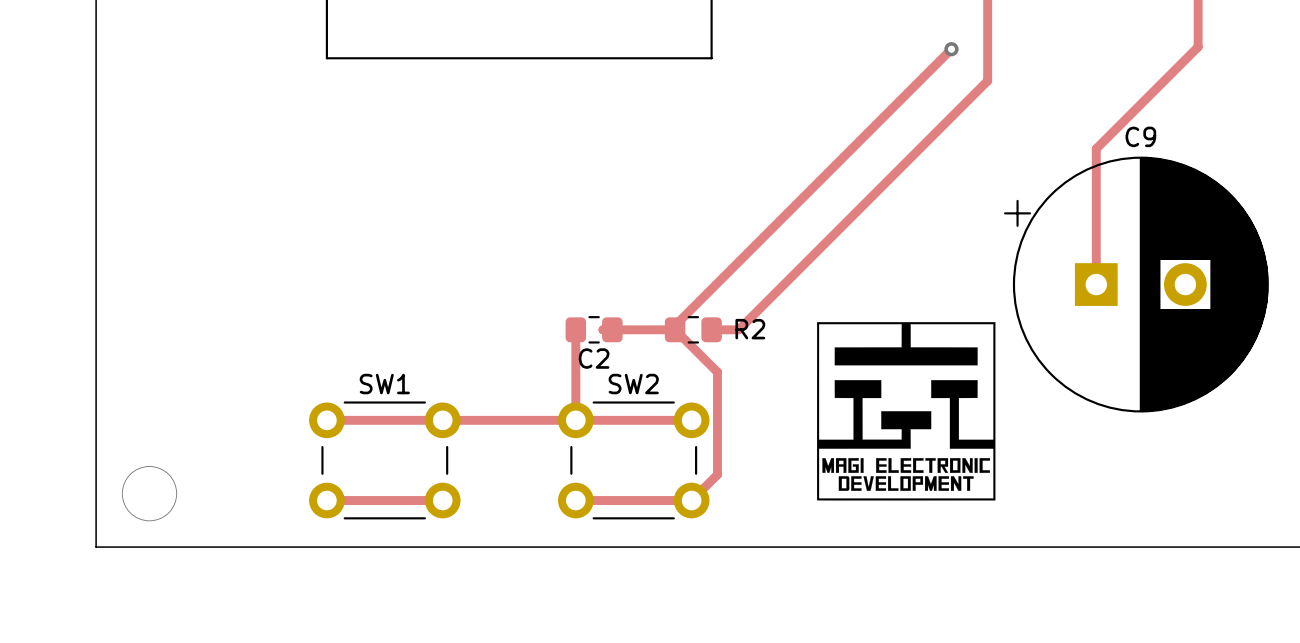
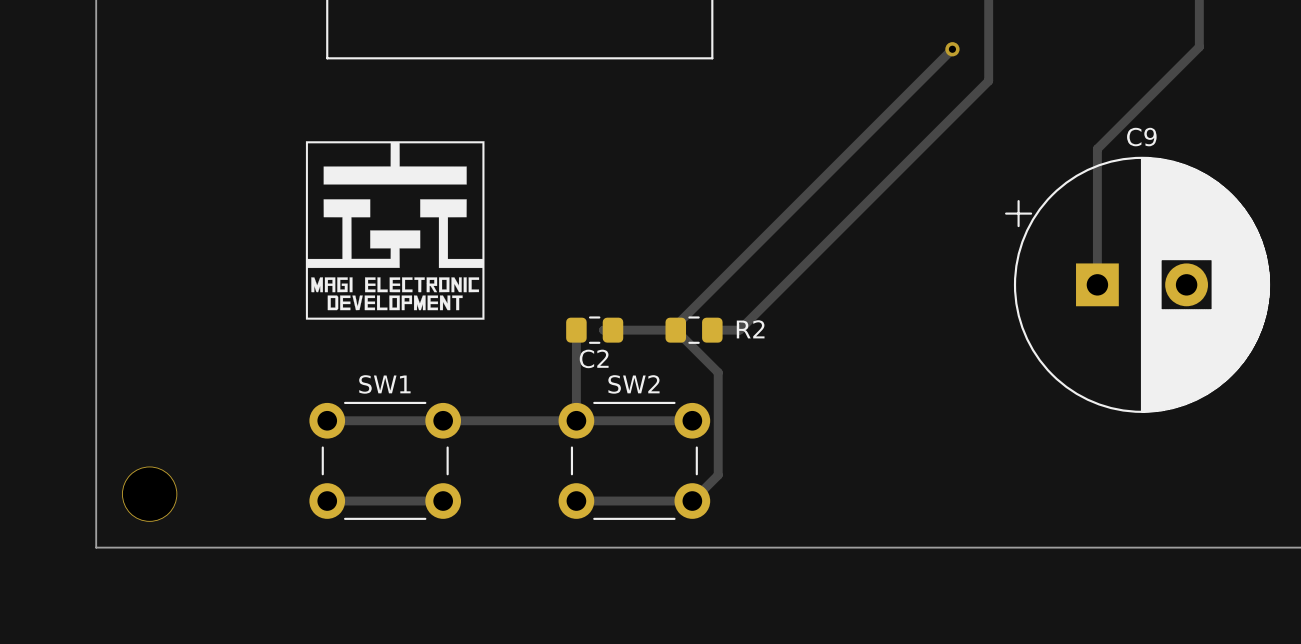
drawing: none -> [305, 141, 485, 320]
drawing: [816, 322, 996, 501] -> none

